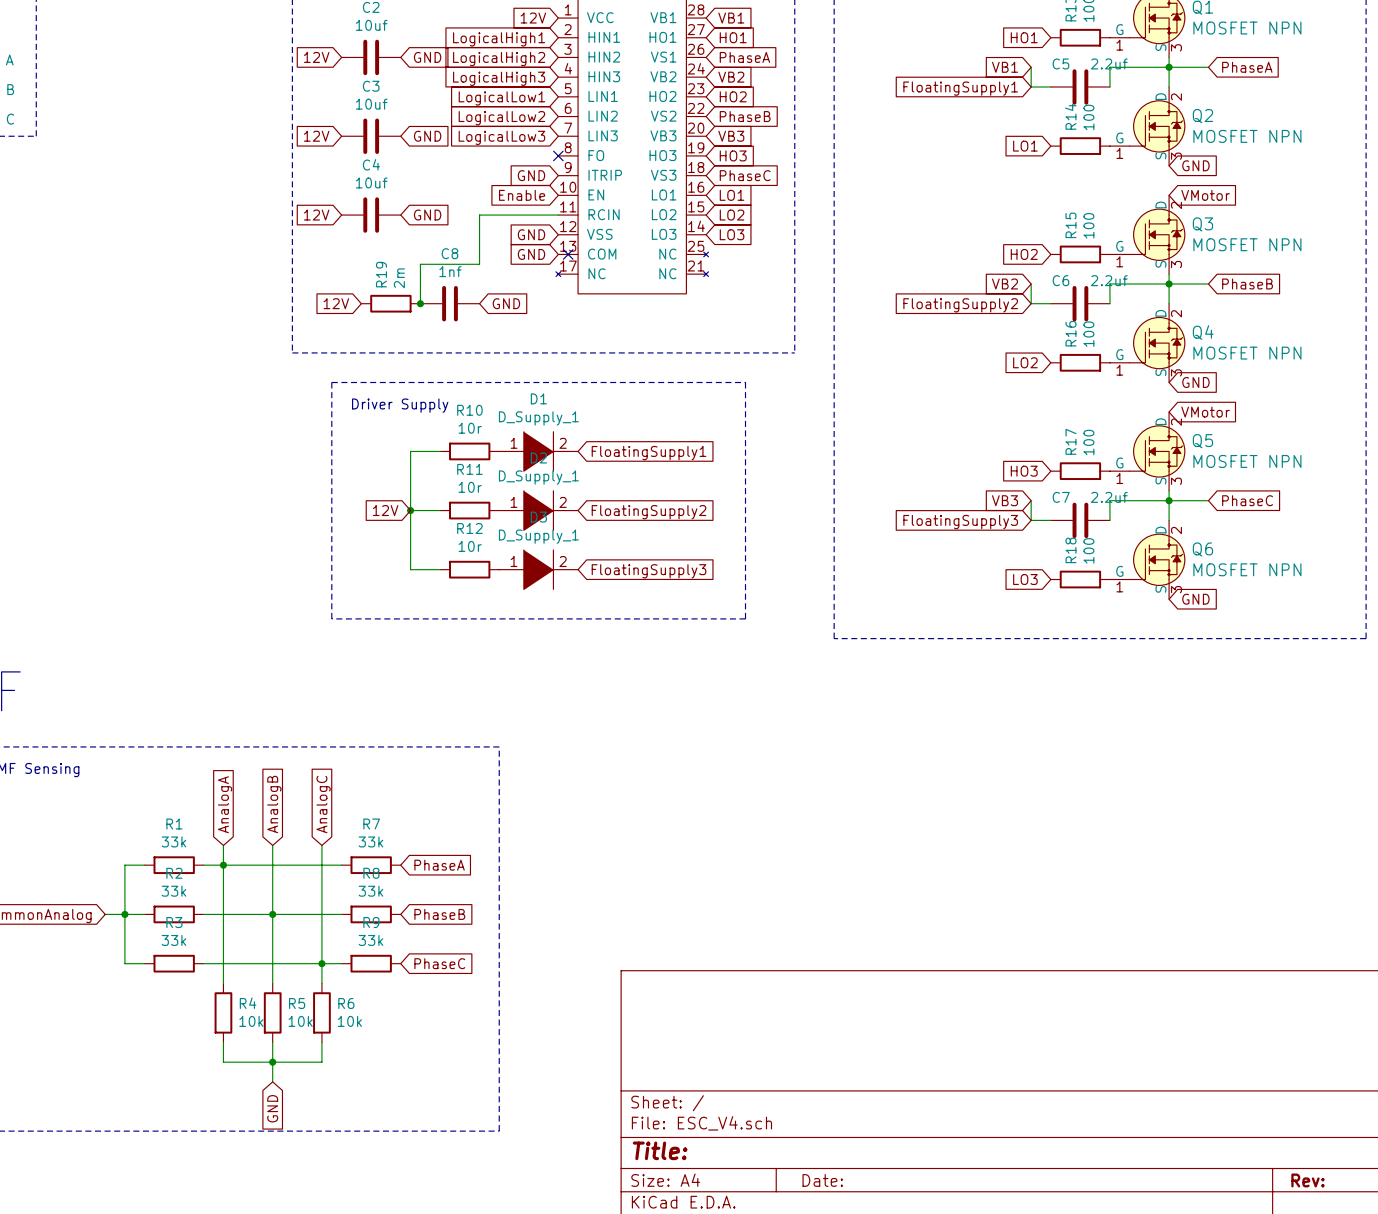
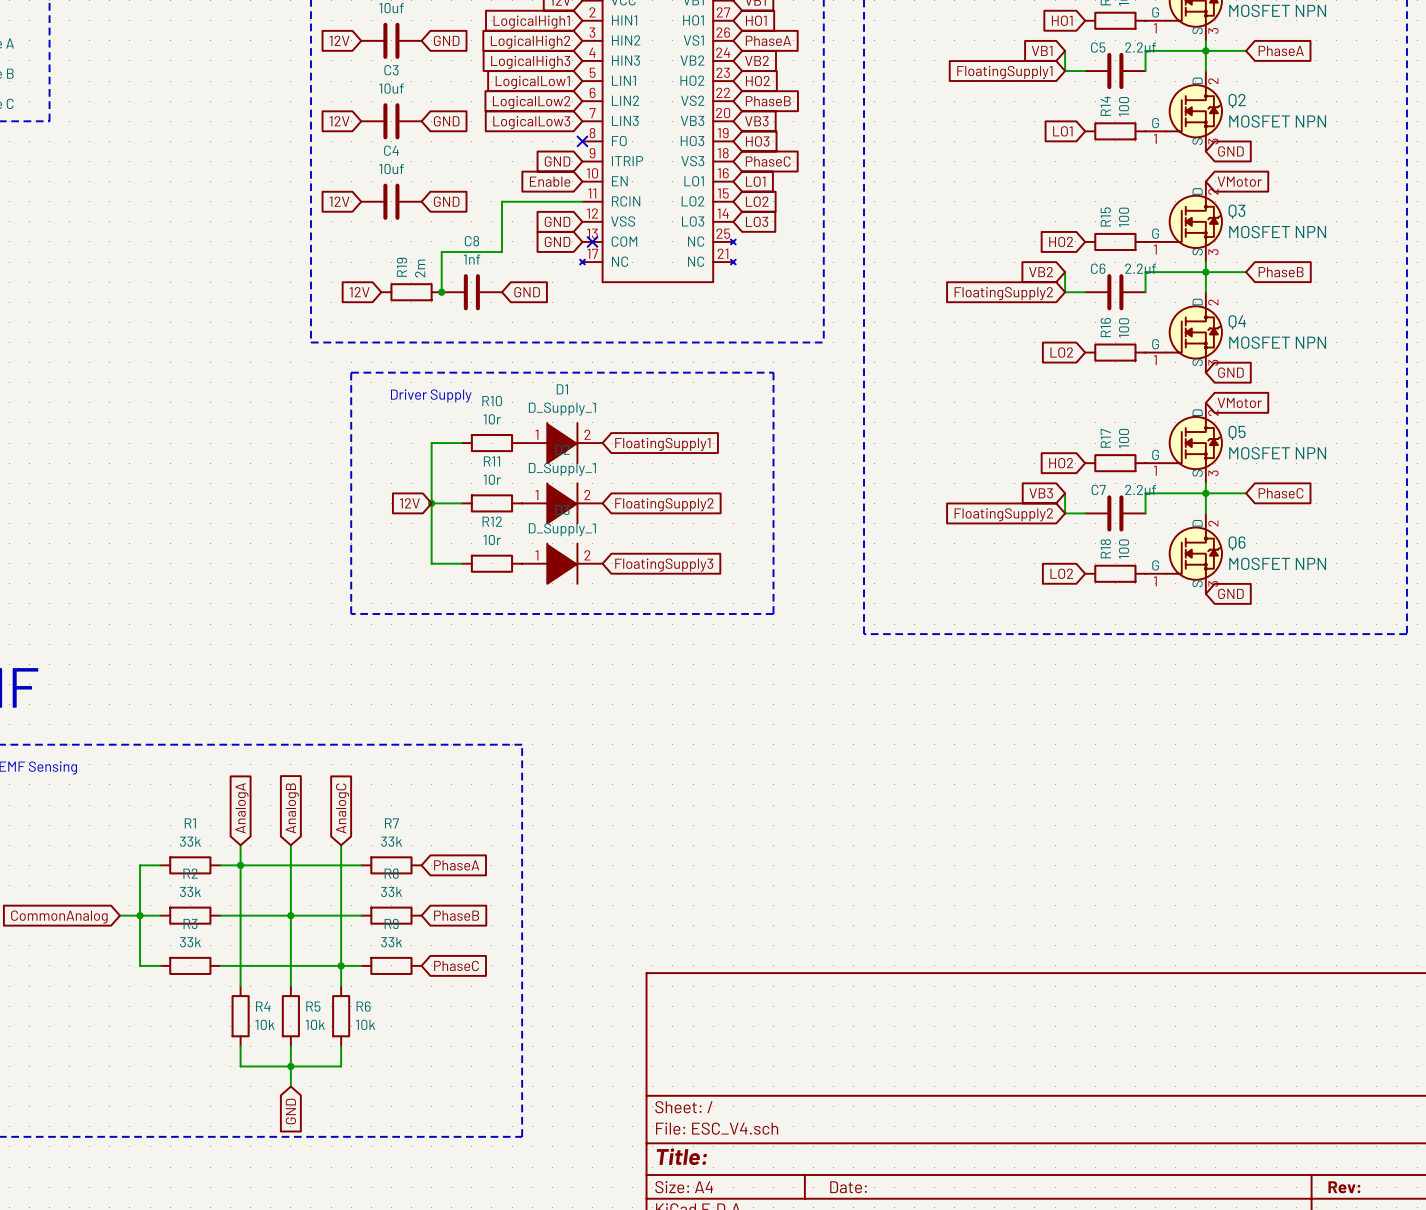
global label: HO3 (1024, 471) -> HO2 (1061, 463)
global label: FloatingSupply3 (960, 522) -> FloatingSupply2 (1003, 514)
global label: LO3 (1025, 579) -> LO2 (1061, 573)

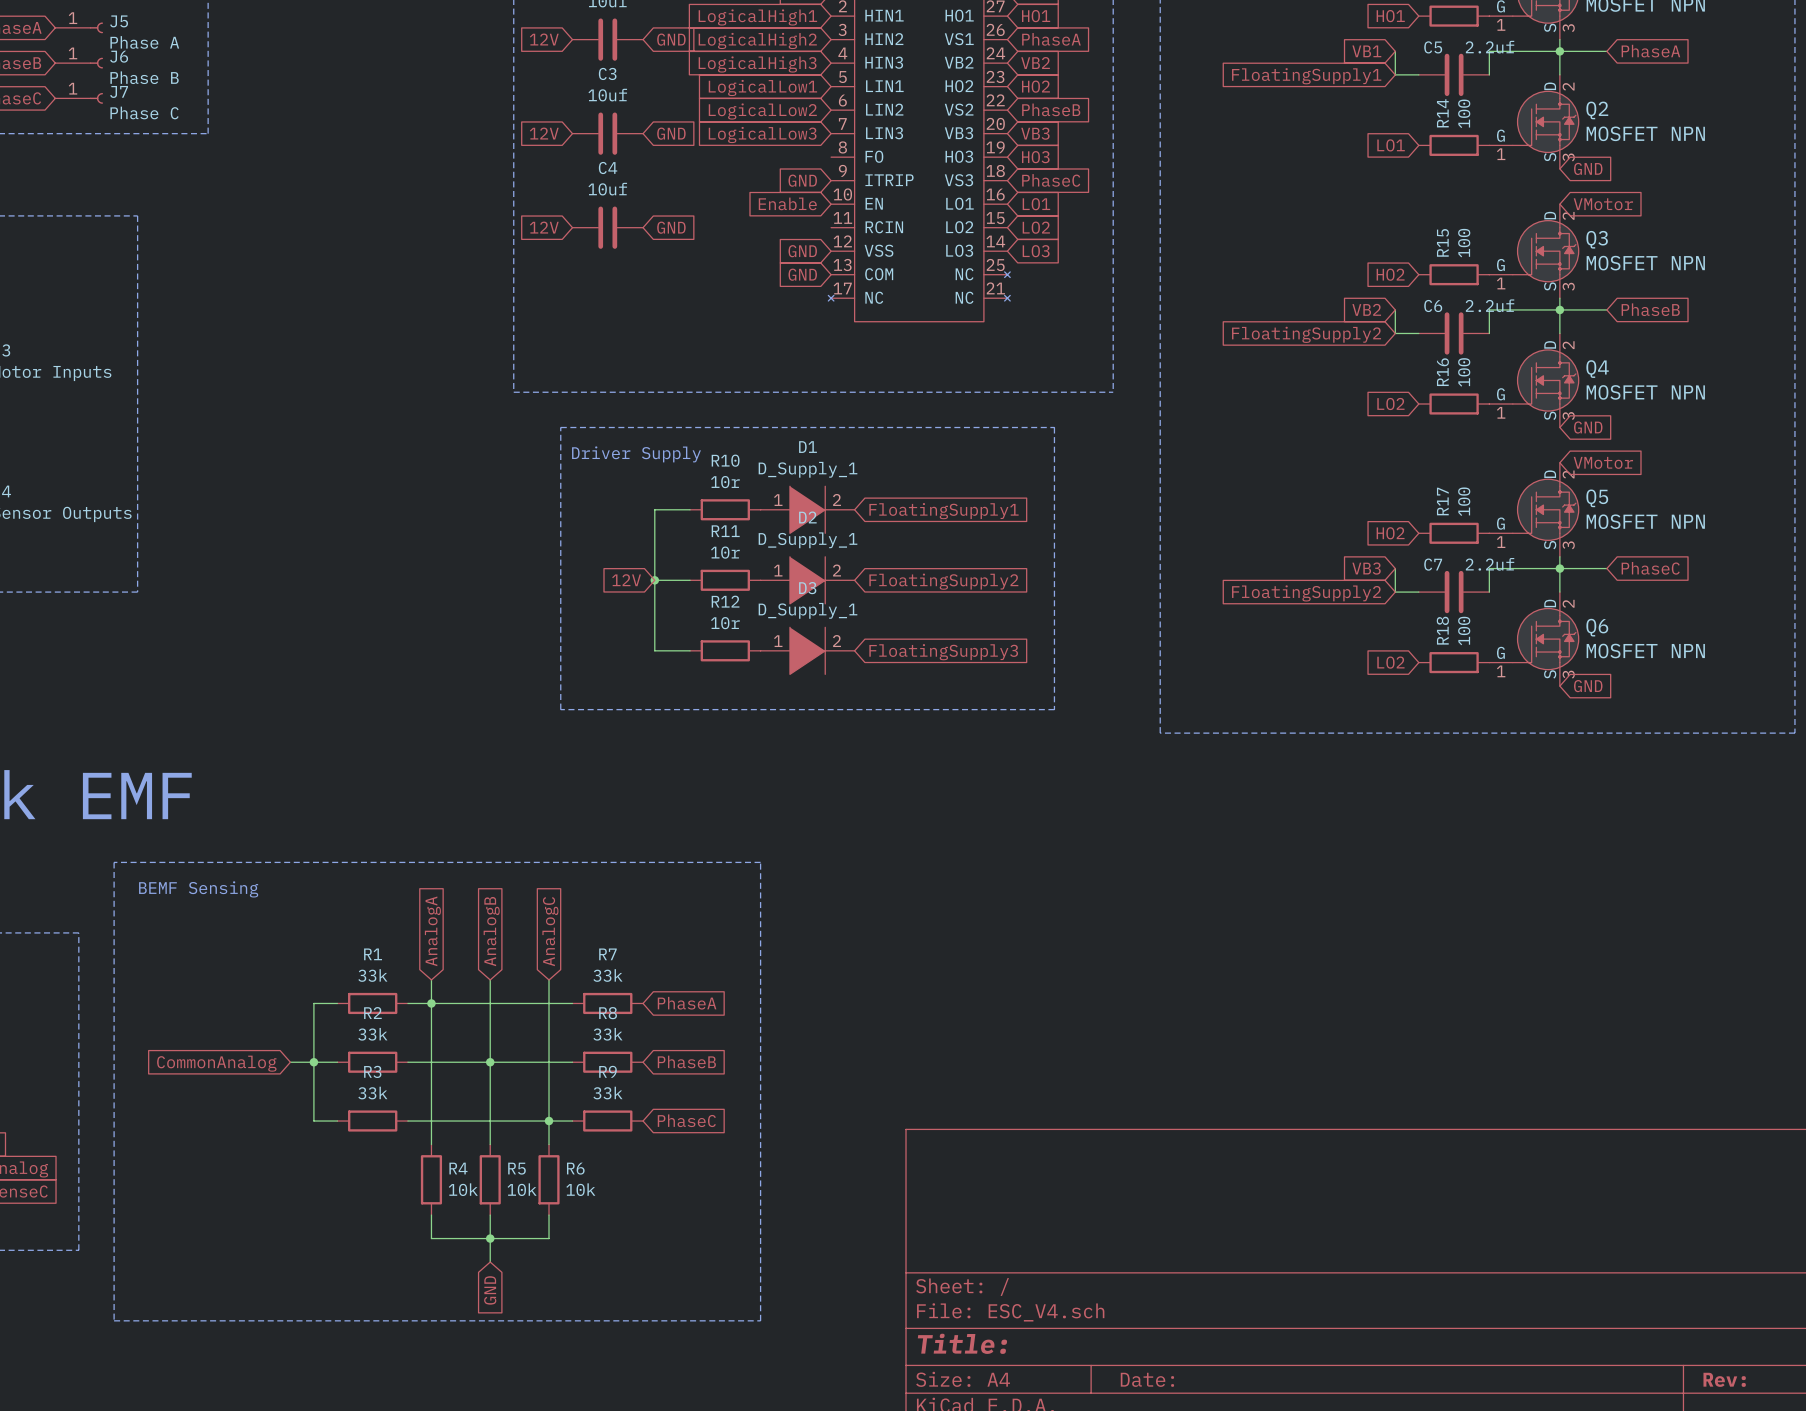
no-connect mark: (582, 141) -> none
wire: (582, 201) (502, 201) (502, 252) (441, 252) (441, 292) -> none
no-connect mark: (592, 241) -> none
global label: 12V (359, 292) -> none
R19: 2m (411, 292) -> none
junction: (441, 292) -> none
C8: 1nf (471, 292) -> none
global label: GND (527, 292) -> none

